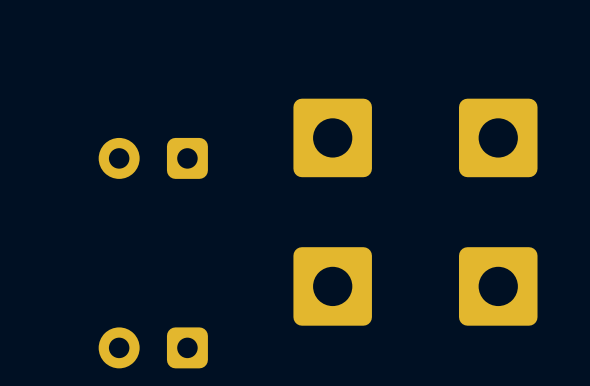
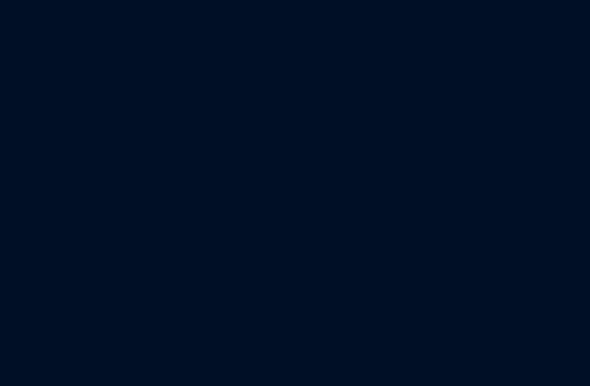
part: (332, 137) -> none
part: (498, 137) -> none
part: (153, 158) -> none
part: (332, 286) -> none
part: (498, 286) -> none
part: (153, 347) -> none

